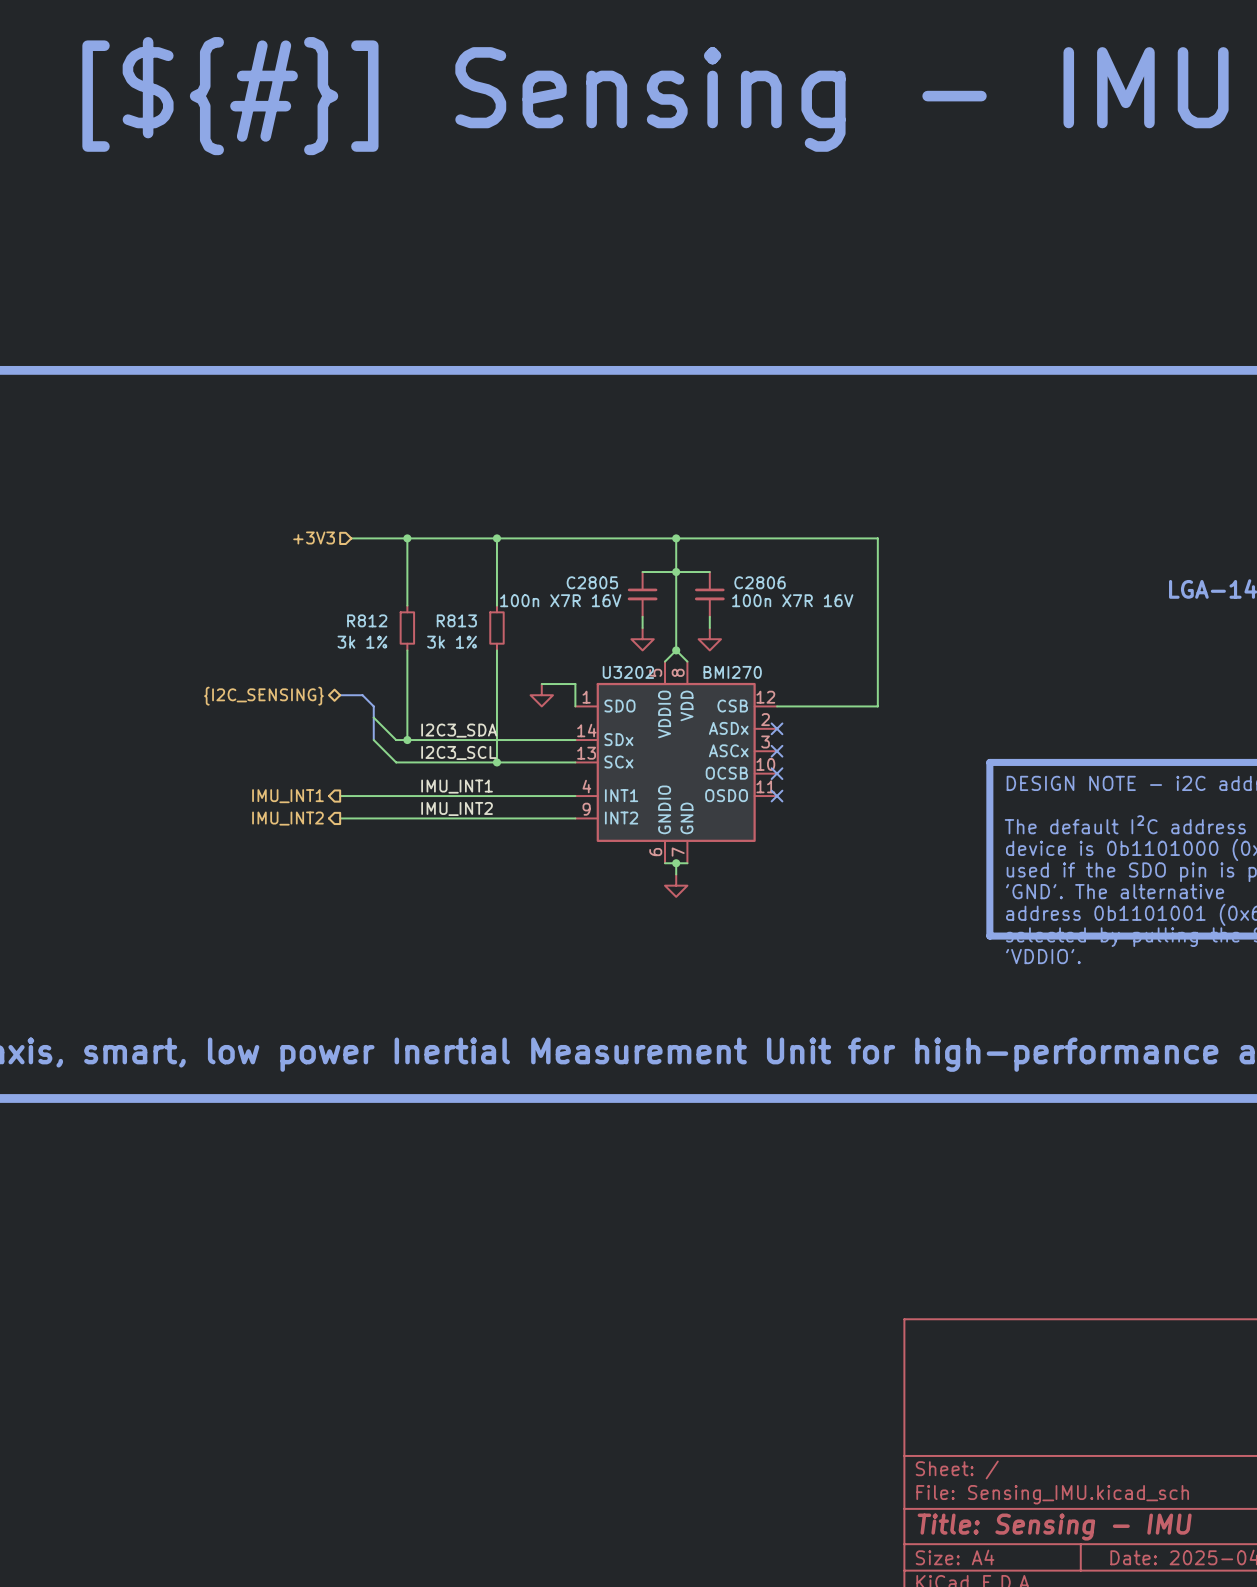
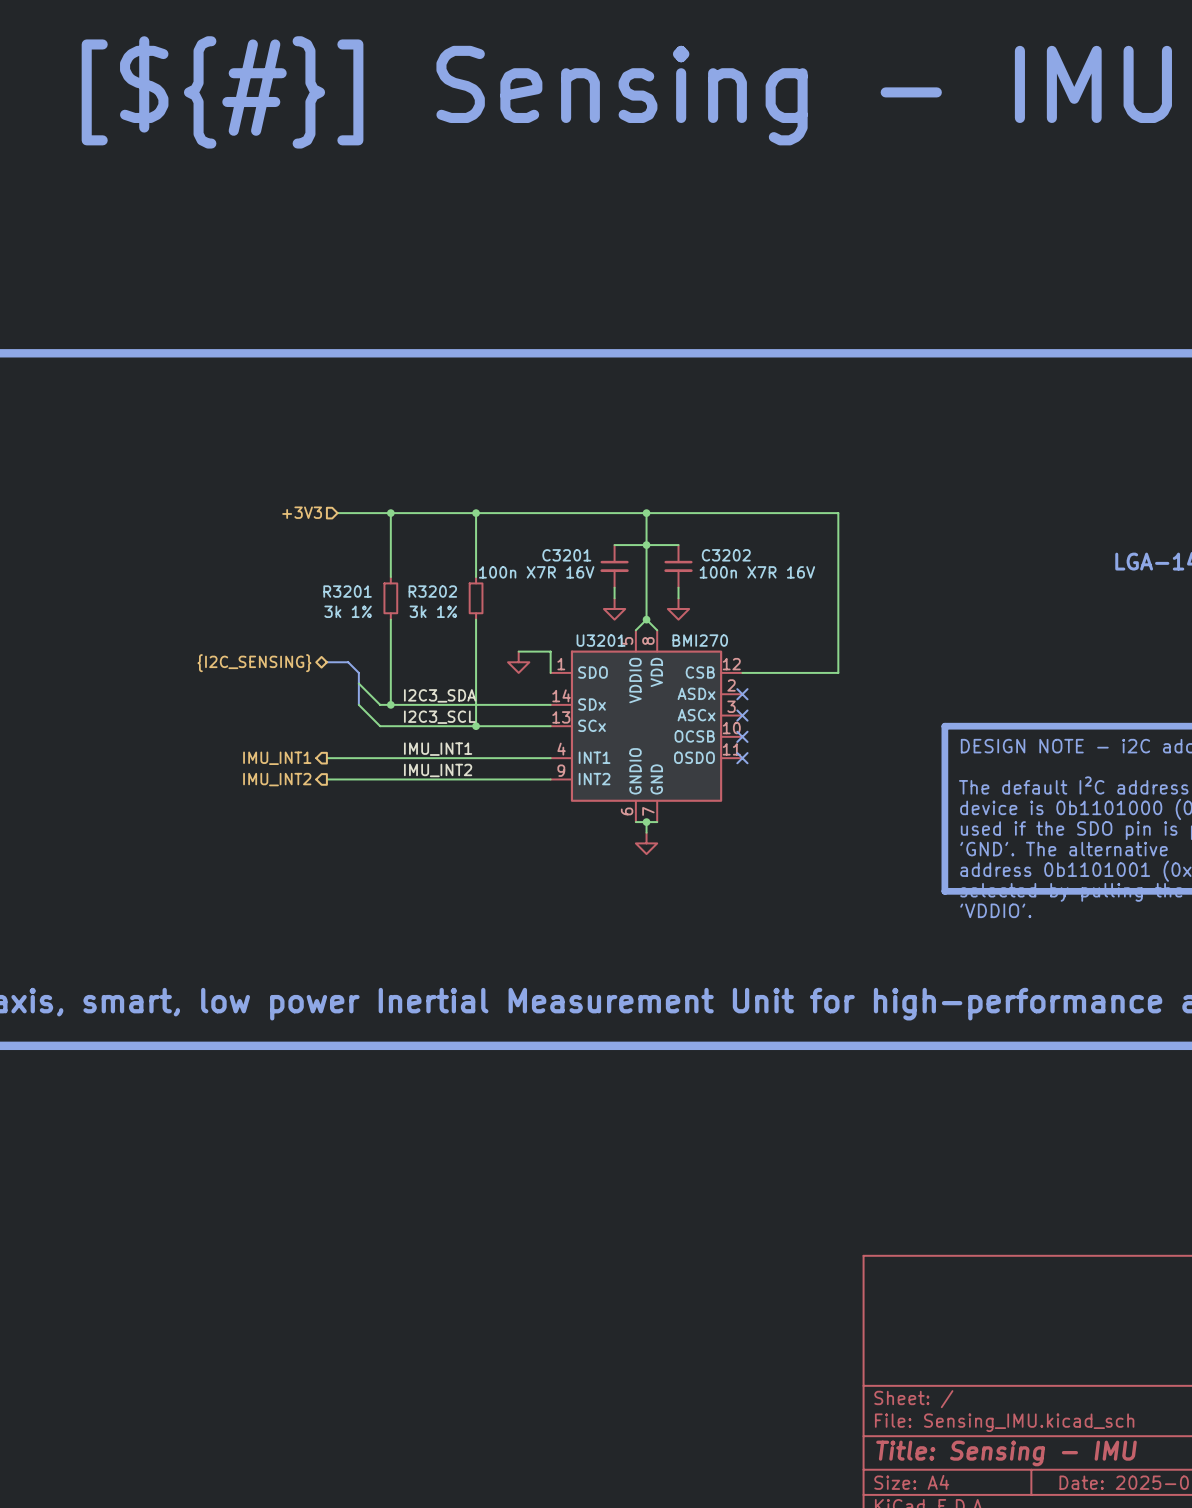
C2805 name: C2805 (592, 582) -> C3201 (566, 555)
C2806 name: C2806 (760, 582) -> C3202 (726, 555)
R812 name: R812 (367, 620) -> R3201 (347, 591)
R813 name: R813 (456, 620) -> R3202 (432, 591)
U3202 name: U3202 (628, 672) -> U3201 (601, 640)

